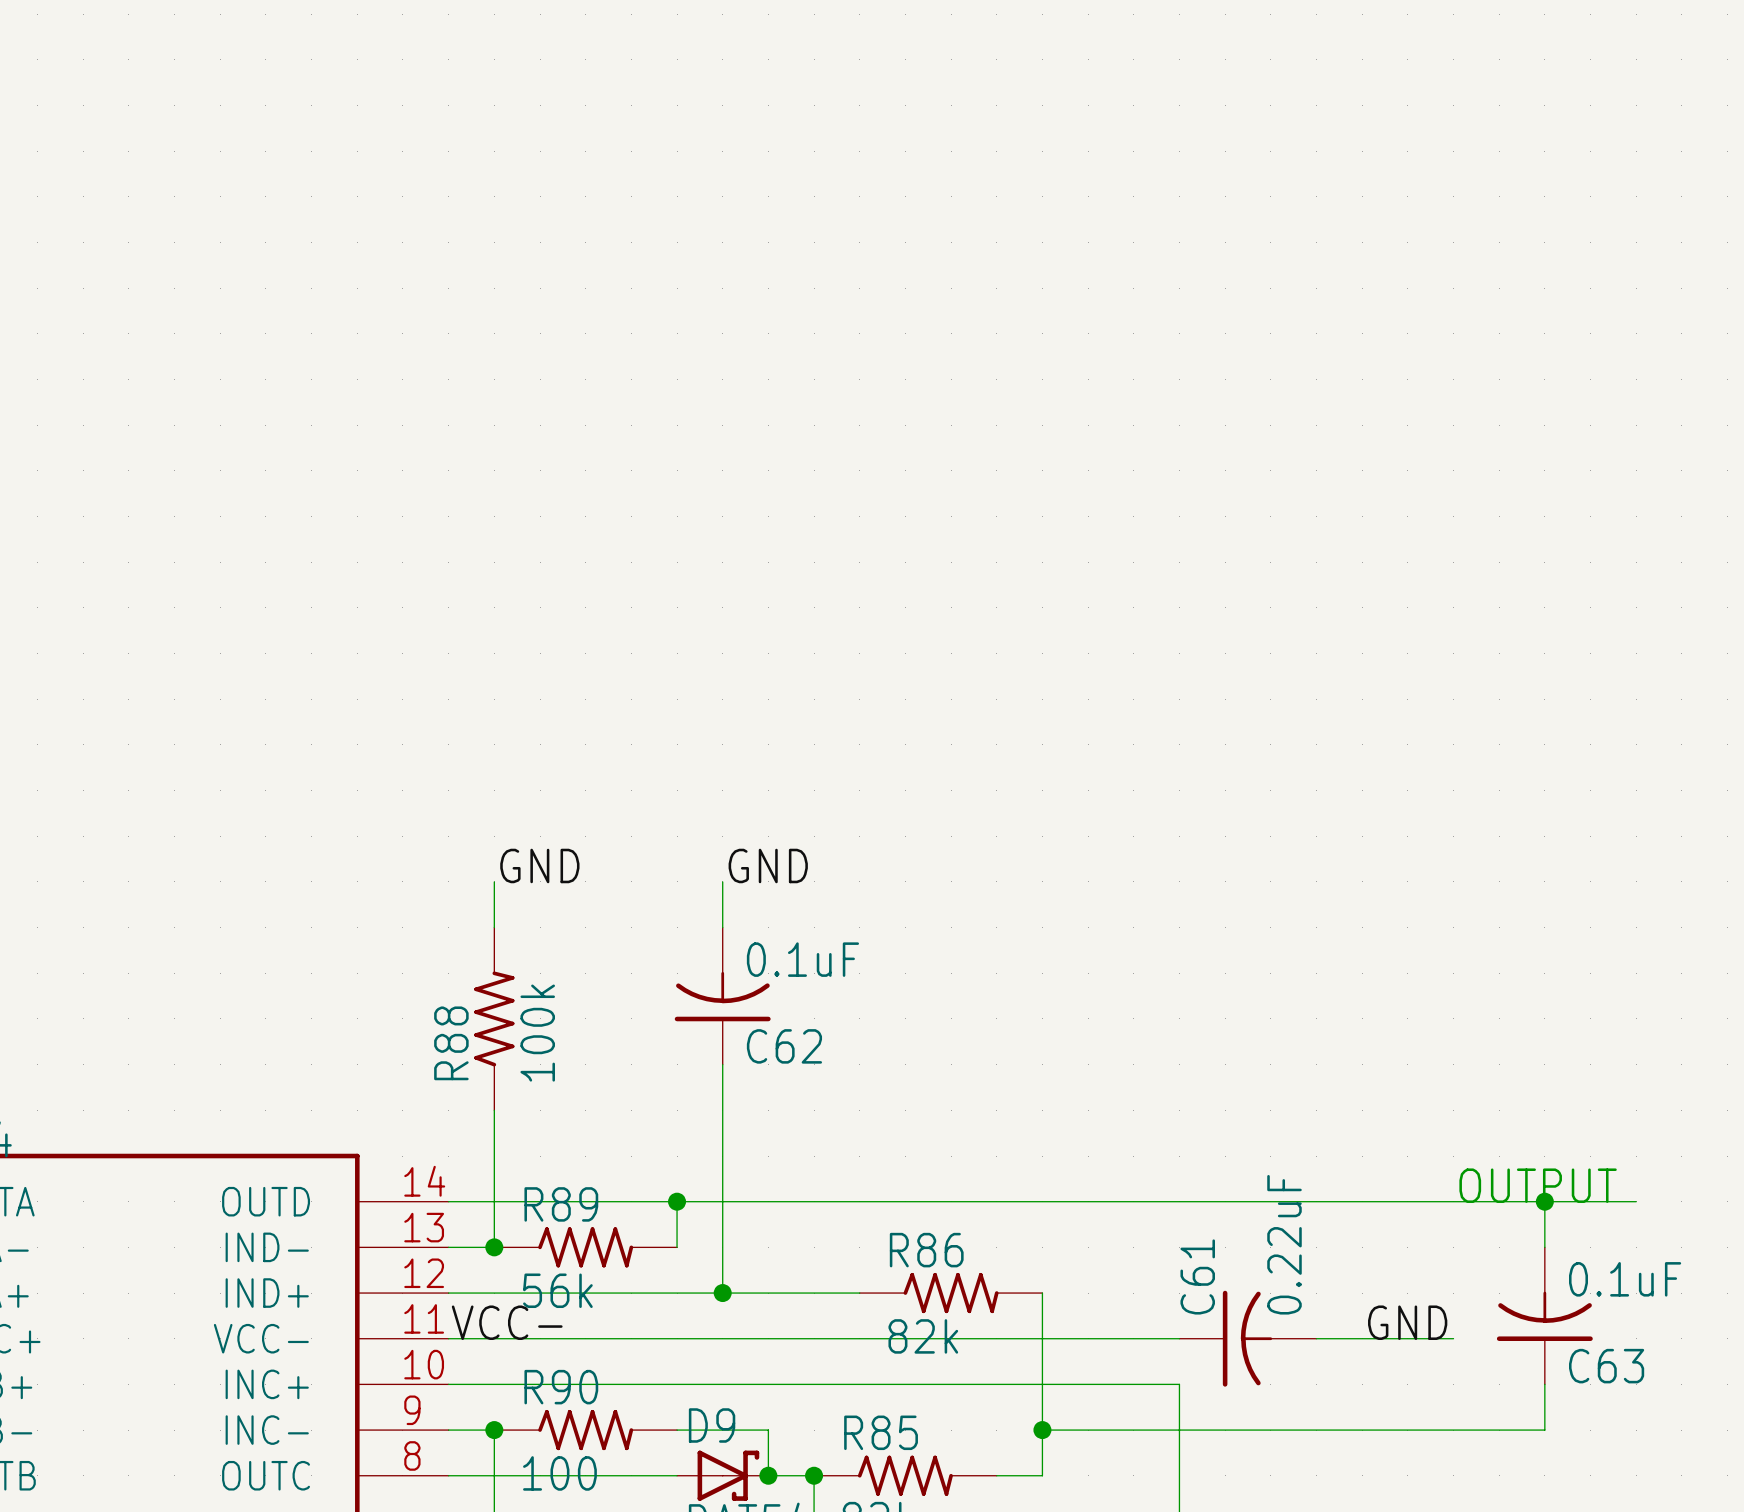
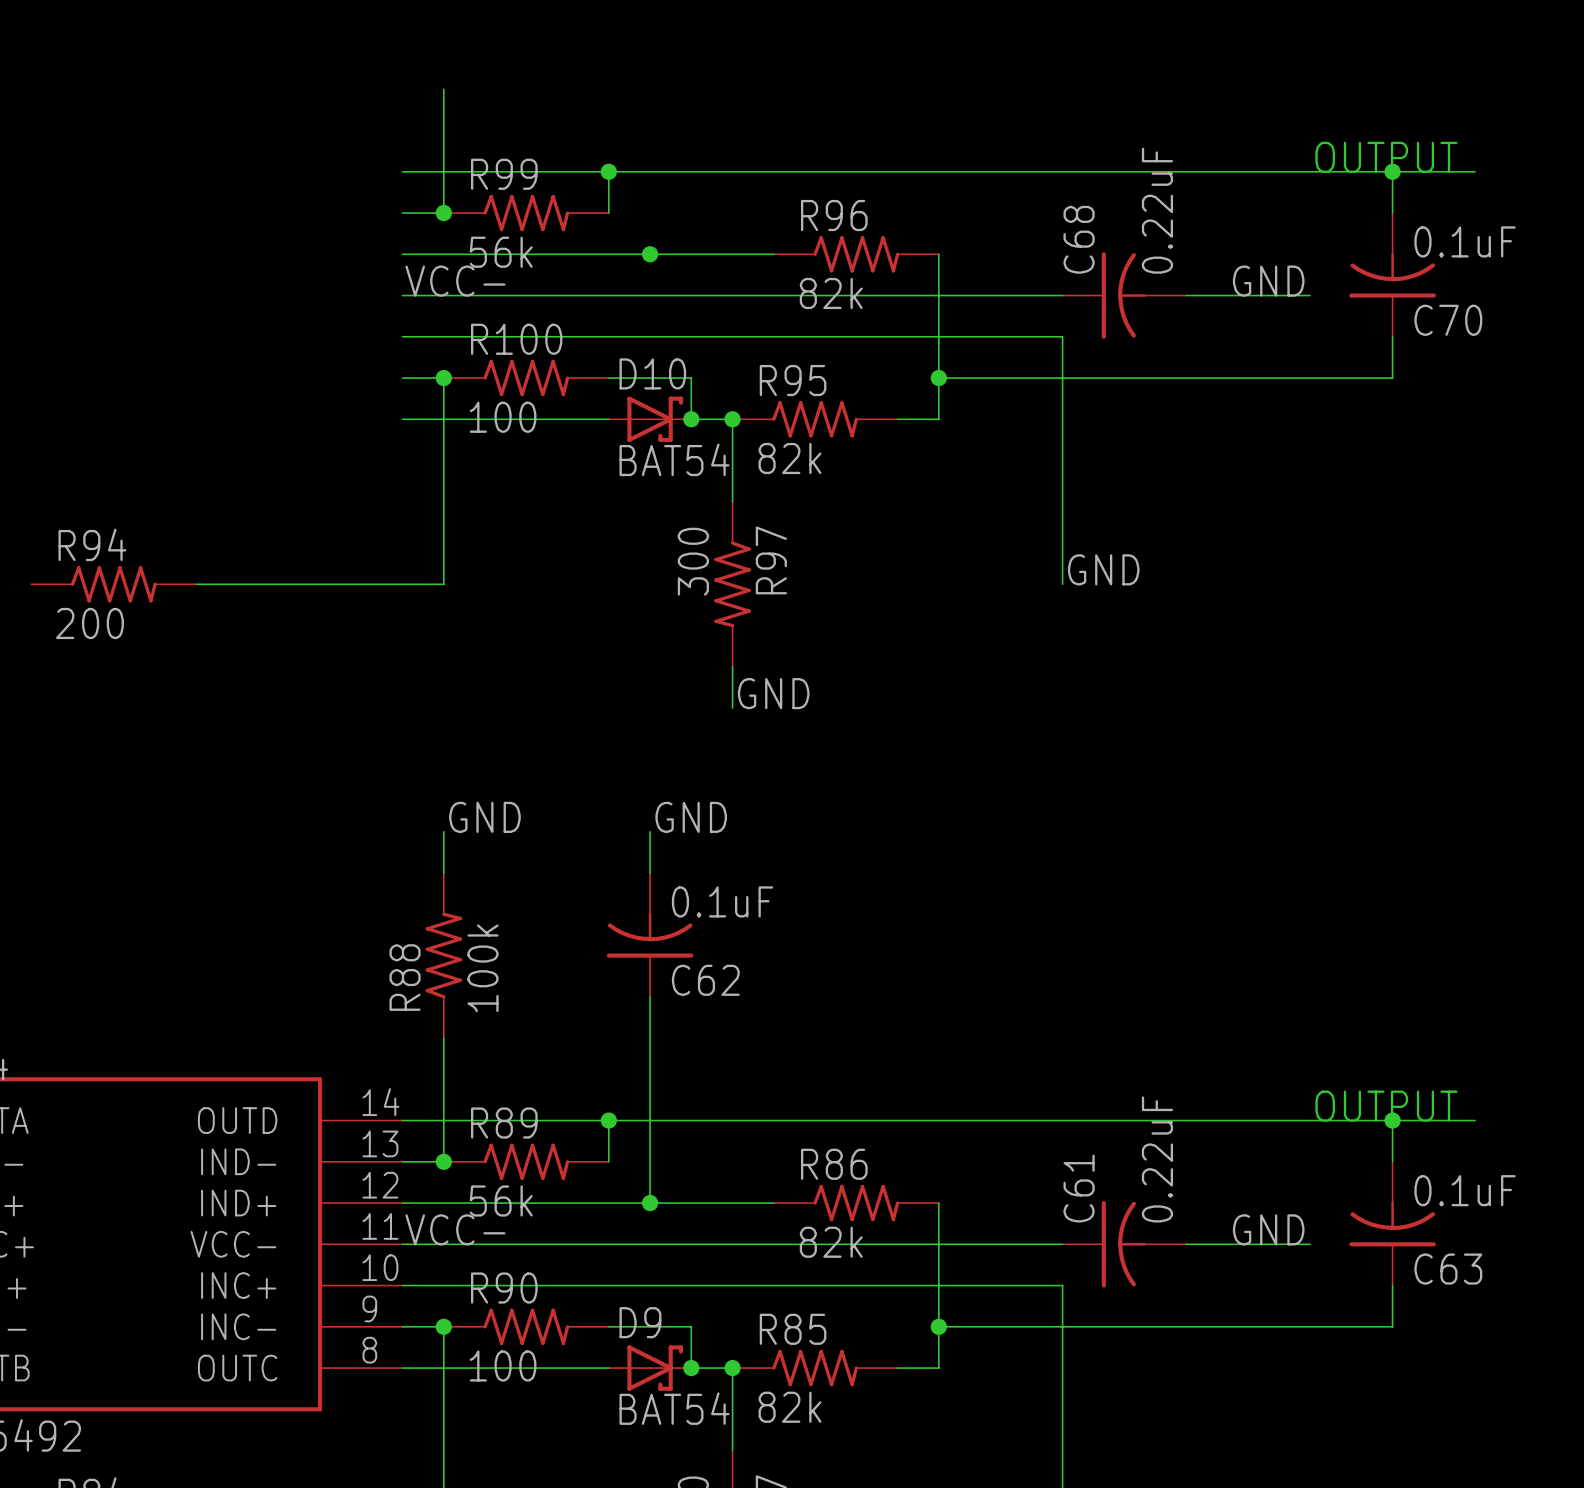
wire: none -> (443, 89) (443, 213) (402, 213)
text: none -> OUTPUT (1386, 157)
wire: none -> (402, 171) (1475, 171)
wire: none -> (608, 171) (608, 213)
junction: none -> (608, 171)
wire: none -> (1392, 171) (1392, 213)
junction: none -> (1392, 171)
junction: none -> (443, 213)
R99: none -> 56k (526, 213)
wire: none -> (402, 254) (773, 254)
junction: none -> (650, 254)
R96: none -> 82k (856, 254)
wire: none -> (938, 254) (938, 419) (897, 419)
C70: none -> 0.1uF (1392, 274)
label: none -> VCC- (455, 281)
label: none -> GND (1268, 281)
wire: none -> (402, 295) (1062, 295)
C68: none -> 0.22uF (1124, 295)
wire: none -> (1186, 295) (1310, 295)
wire: none -> (402, 336) (1062, 336) (1062, 584)
wire: none -> (1392, 336) (1392, 378) (938, 378)
wire: none -> (402, 378) (443, 378) (443, 584) (196, 584)
junction: none -> (443, 378)
R100: none -> 100 (526, 378)
wire: none -> (608, 378) (691, 378) (691, 419) (732, 419) (732, 501)
junction: none -> (938, 378)
wire: none -> (402, 419) (608, 419)
D10: none -> BAT54 (650, 419)
junction: none -> (691, 419)
junction: none -> (732, 419)
R95: none -> 82k (815, 419)
label: none -> GND (1103, 569)
R94: none -> 200 (113, 584)
R97: none -> 300 (732, 584)
wire: none -> (732, 666) (732, 708)
label: none -> GND (773, 693)

